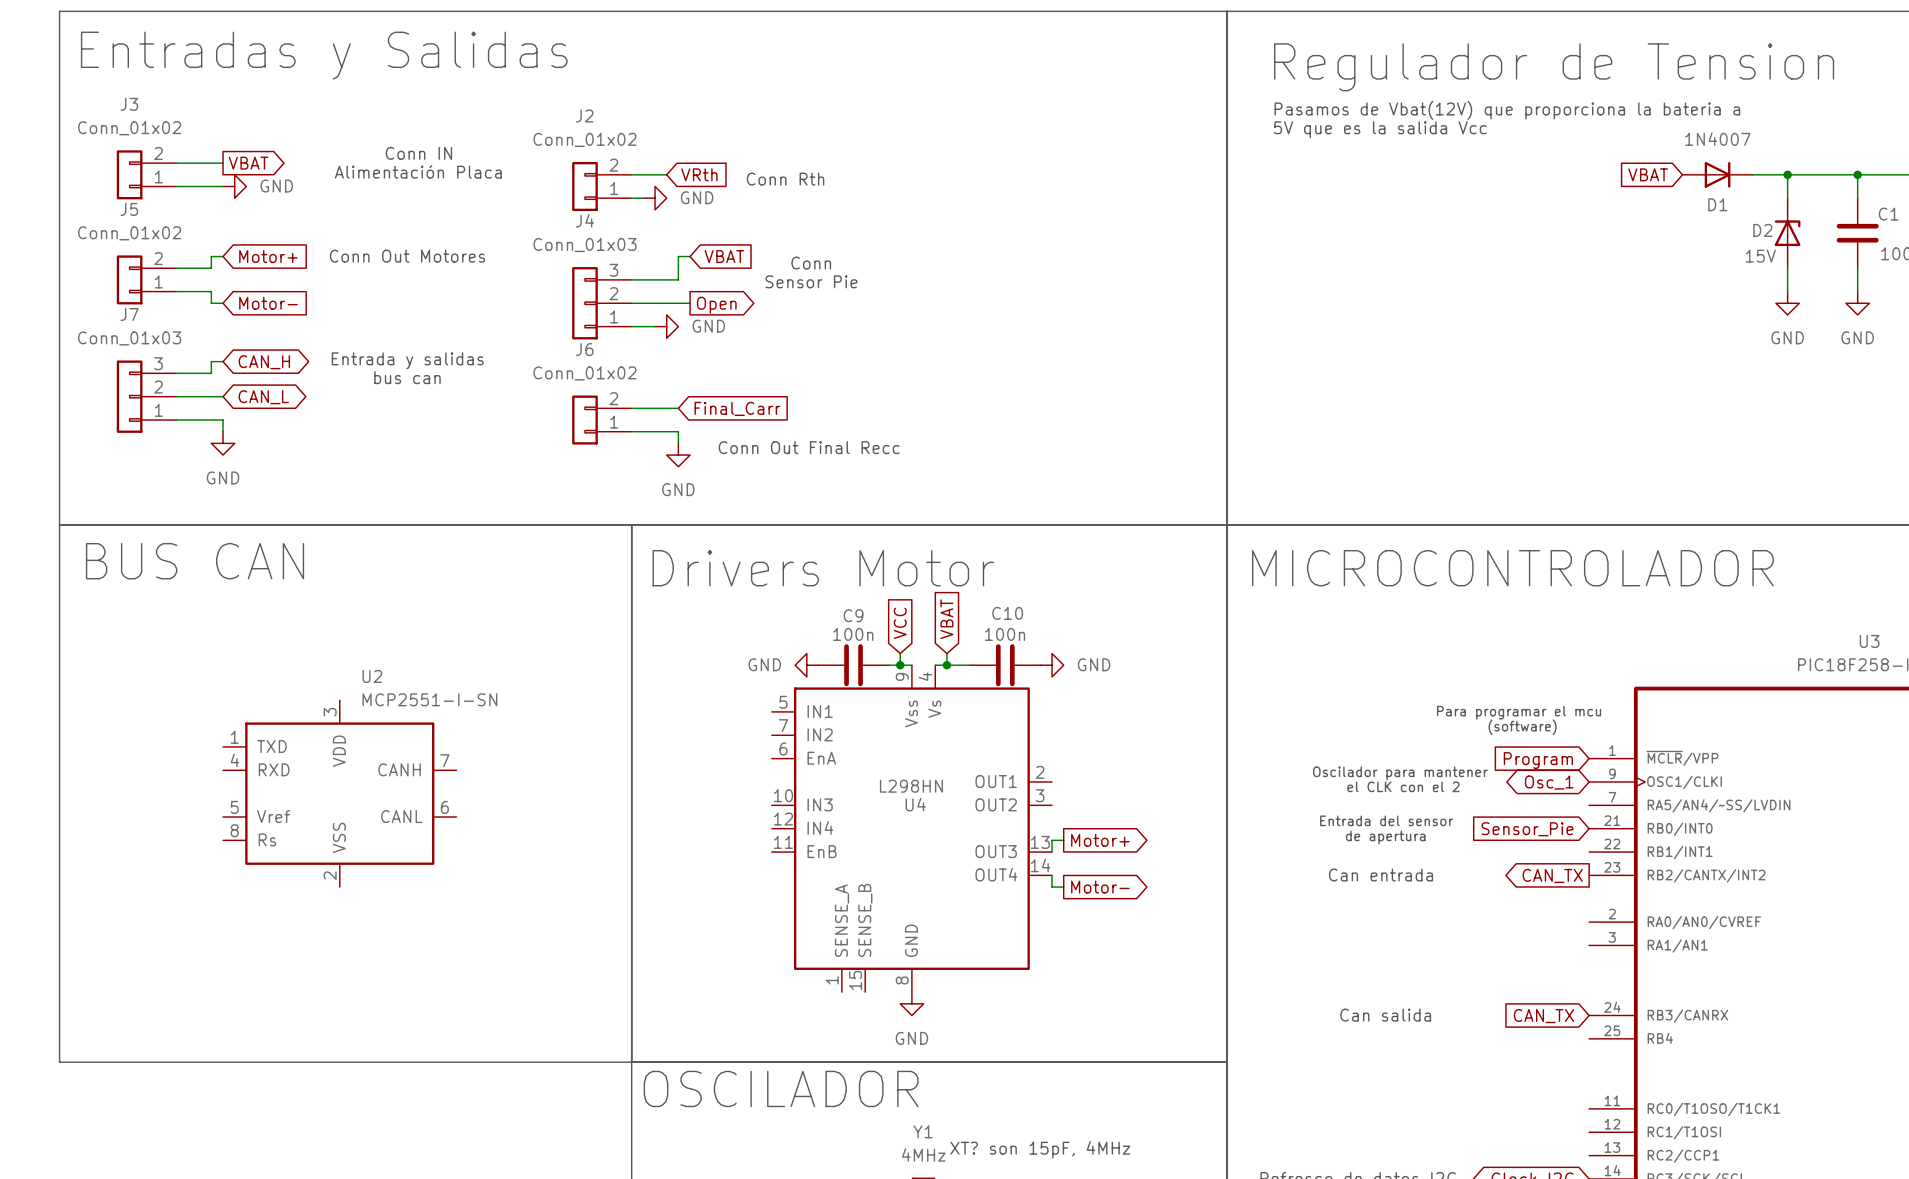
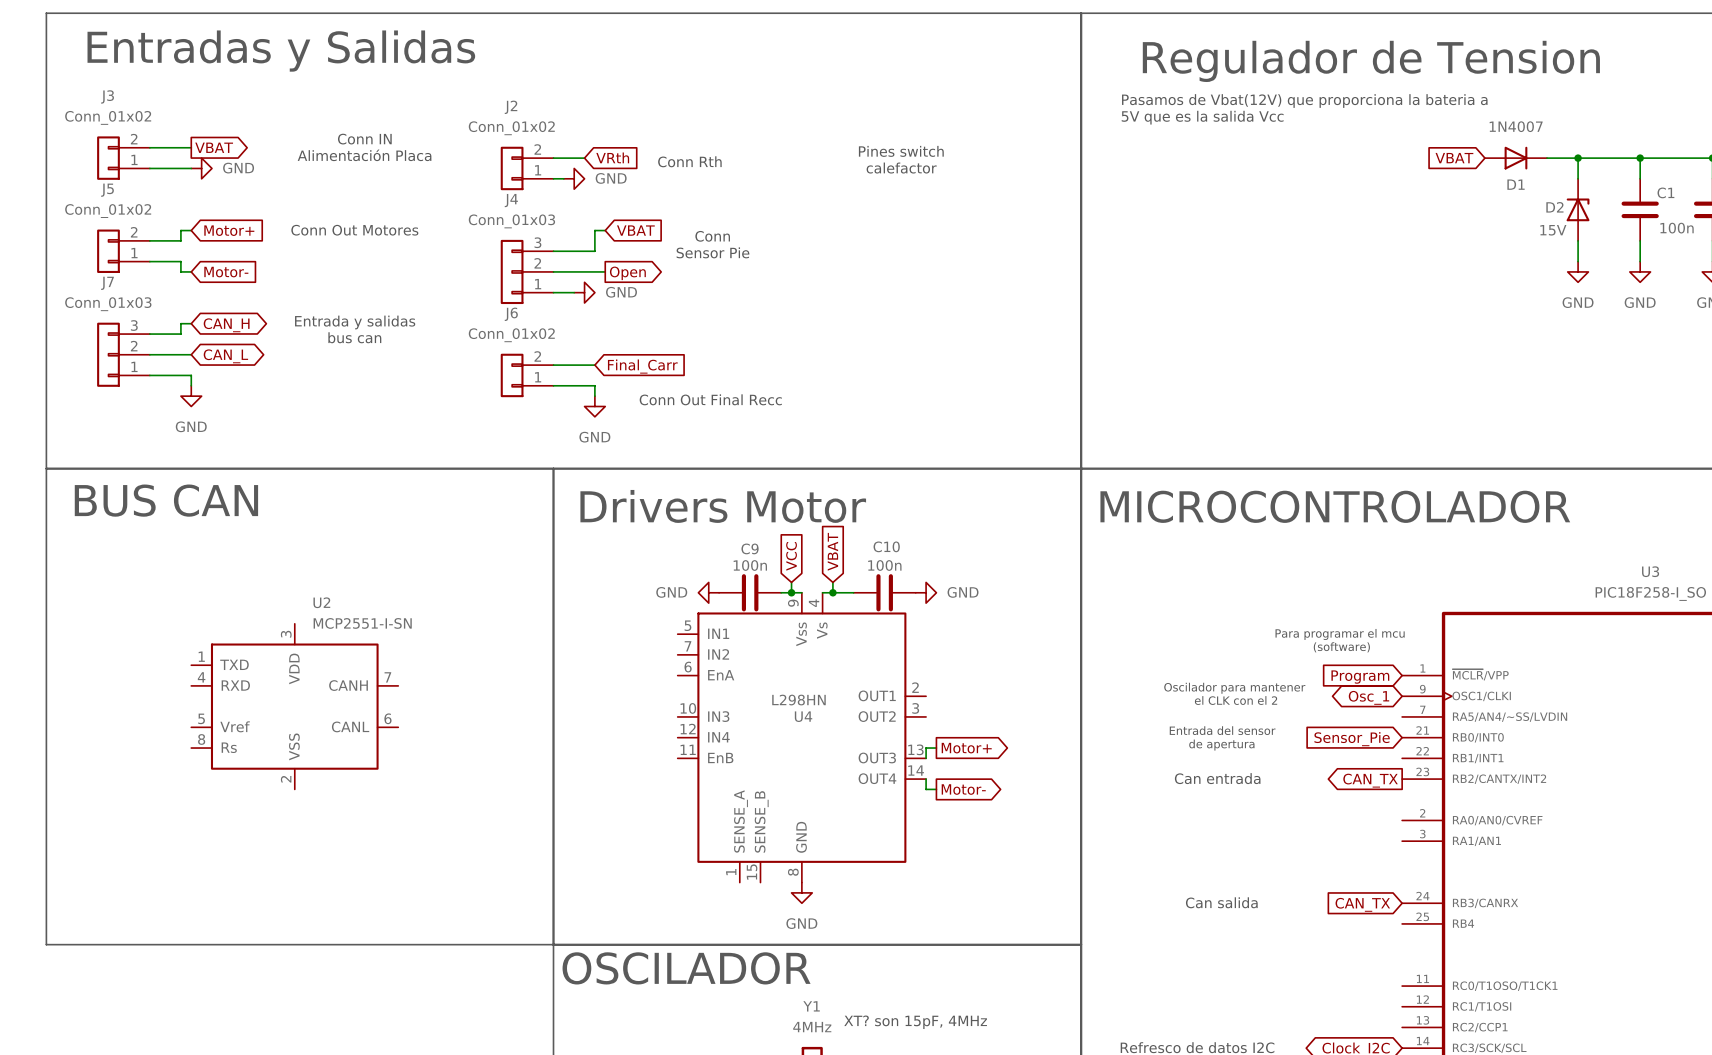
text: none -> Pines switch (901, 151)
text: none -> calefactor (901, 168)

